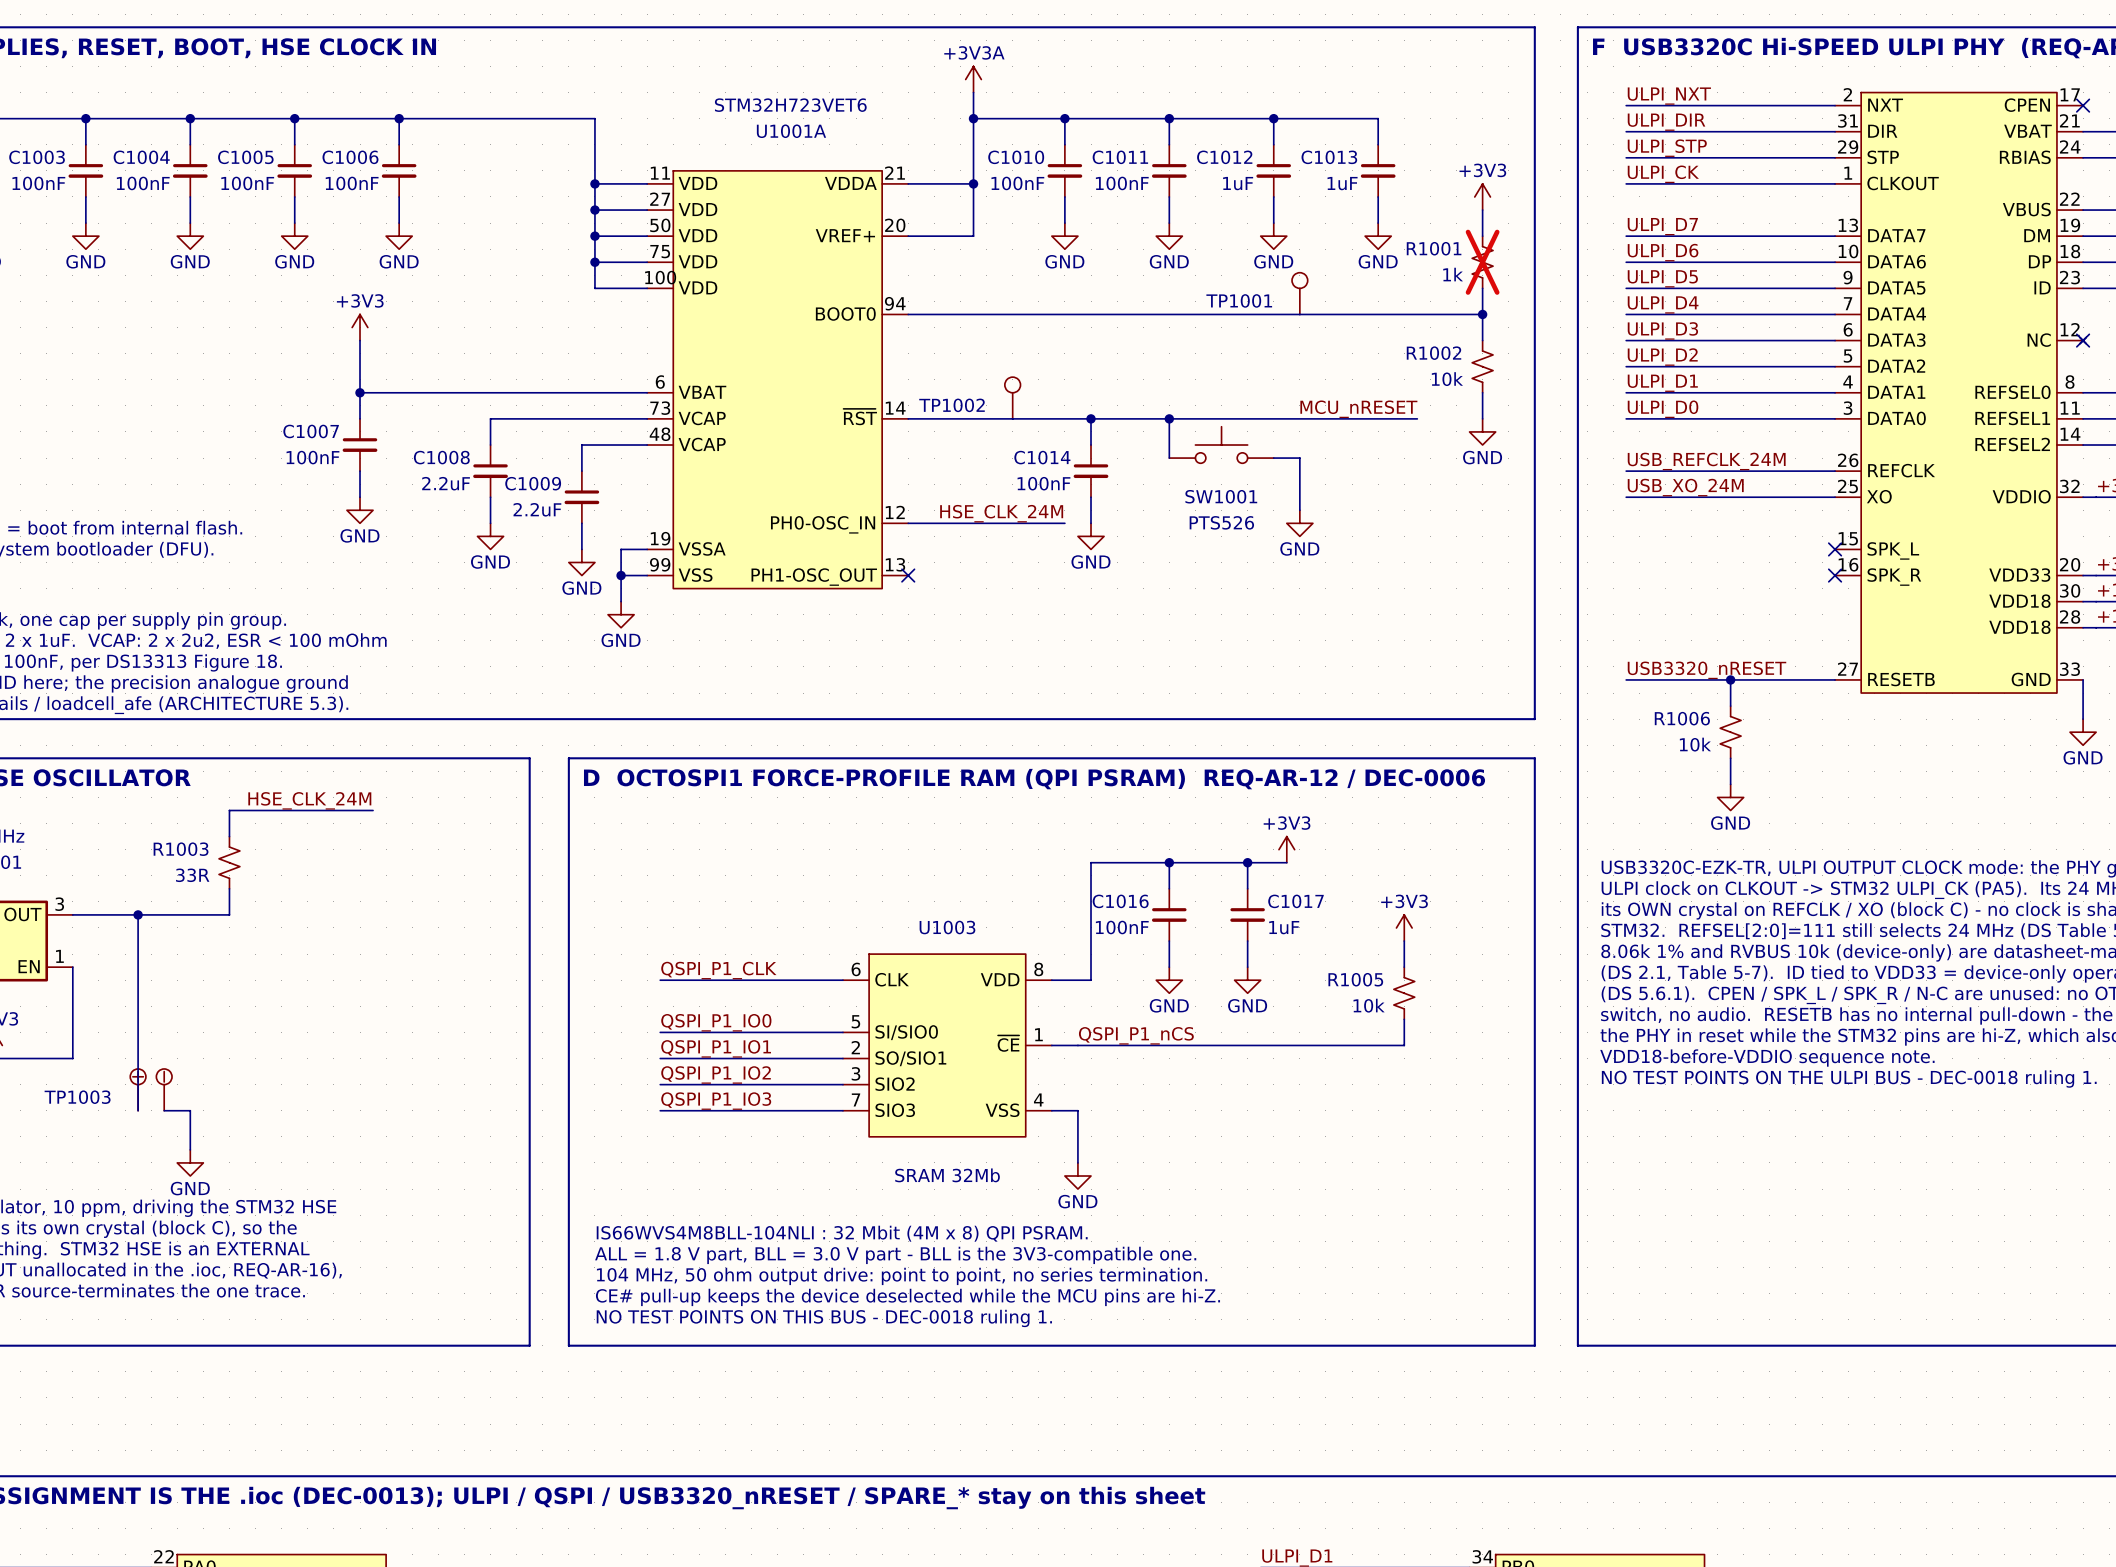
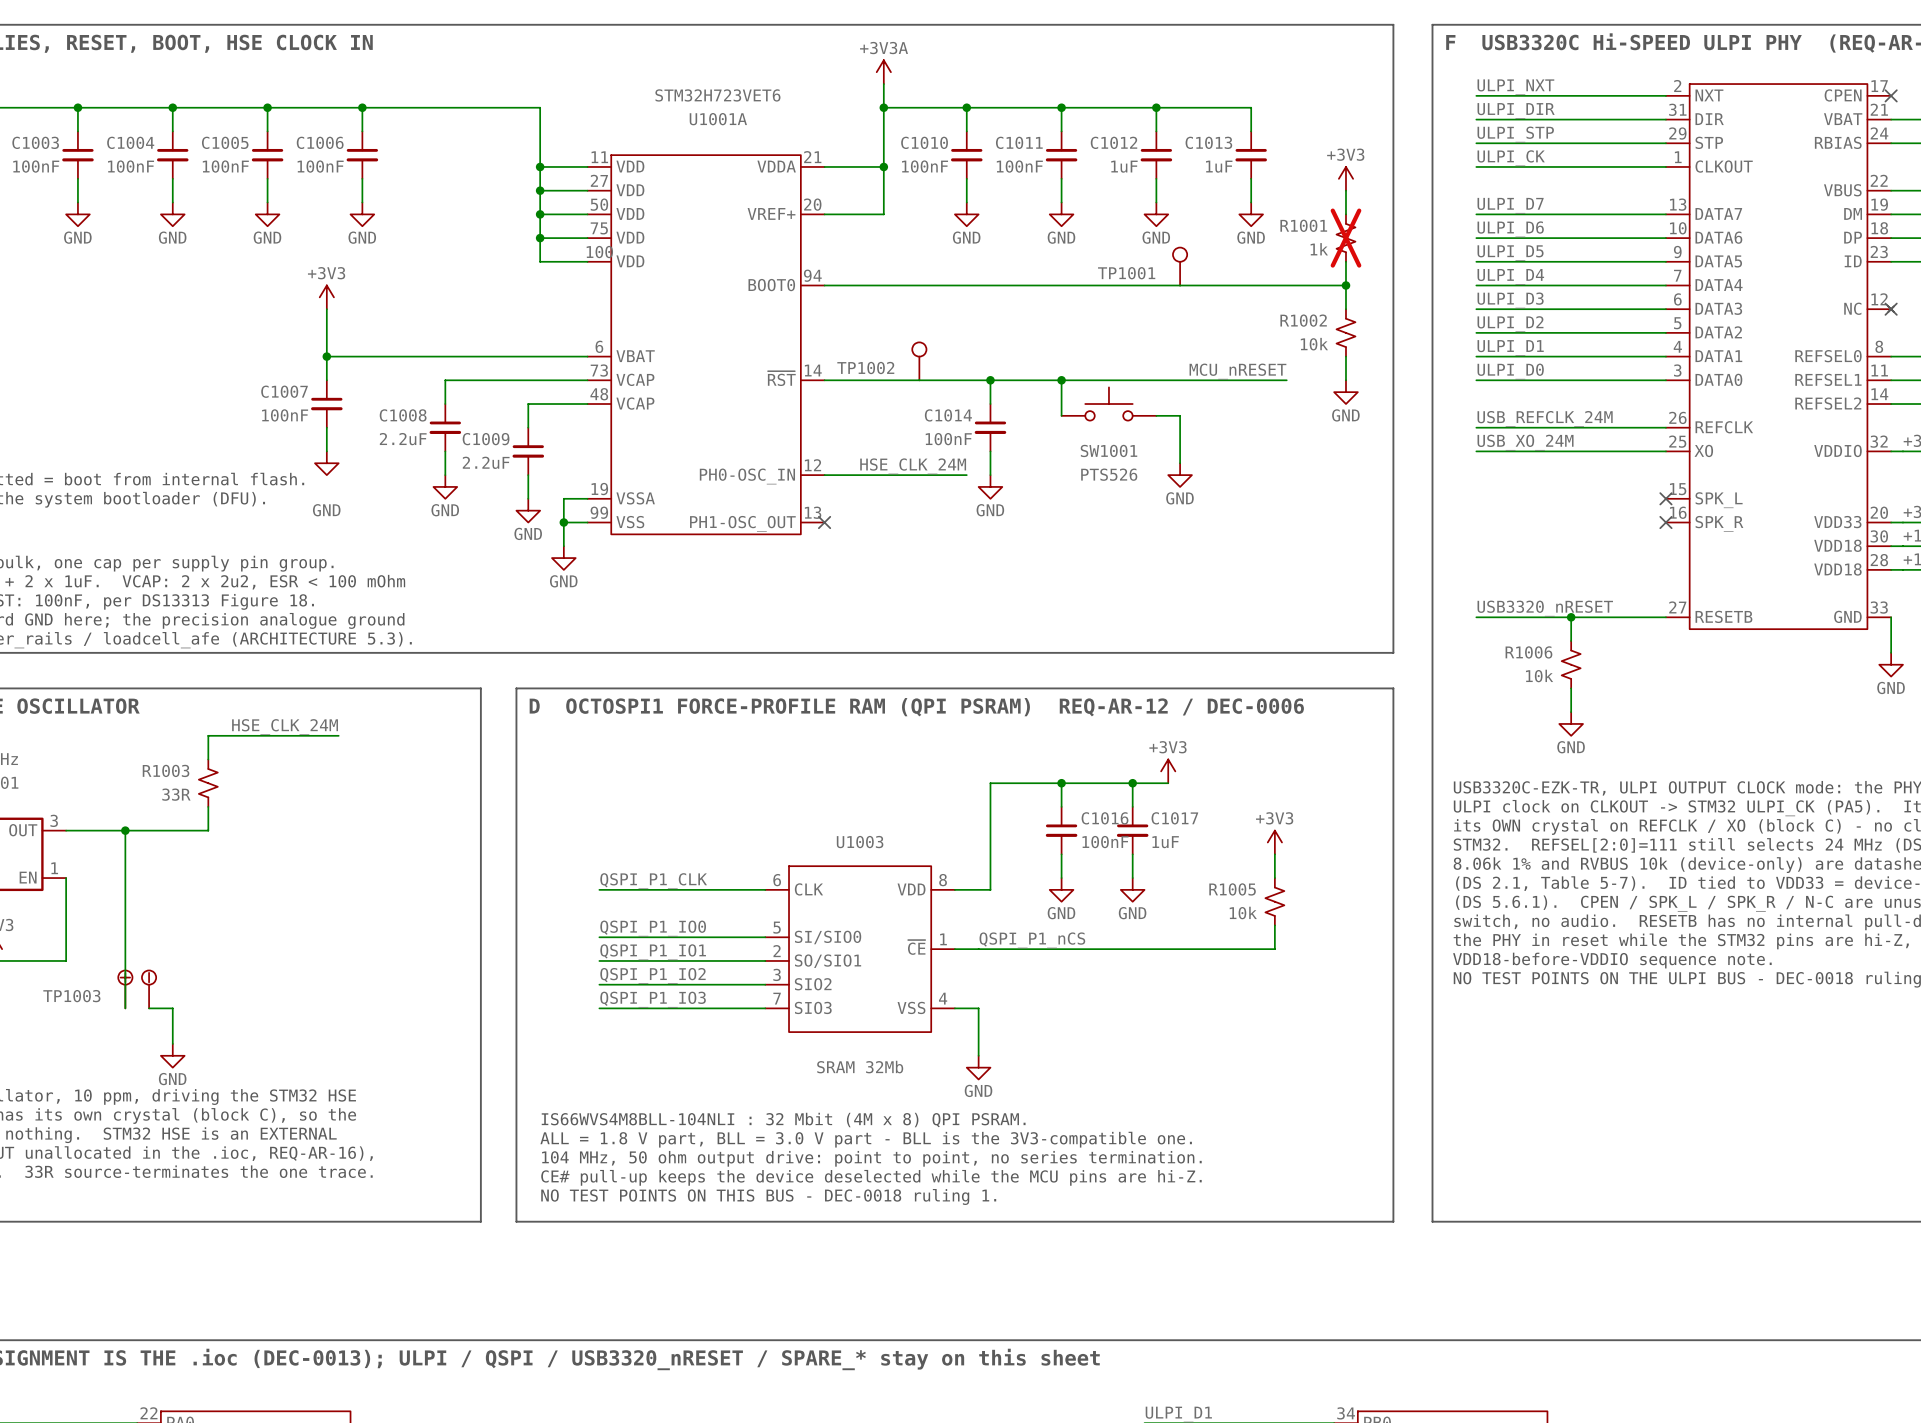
power symbol text position: GND (359, 535) -> GND (326, 510)
C1016 name position: C1016 (1120, 901) -> C1016 (1105, 818)
C1016 value position: 100nF (1122, 927) -> 100nF (1105, 842)

